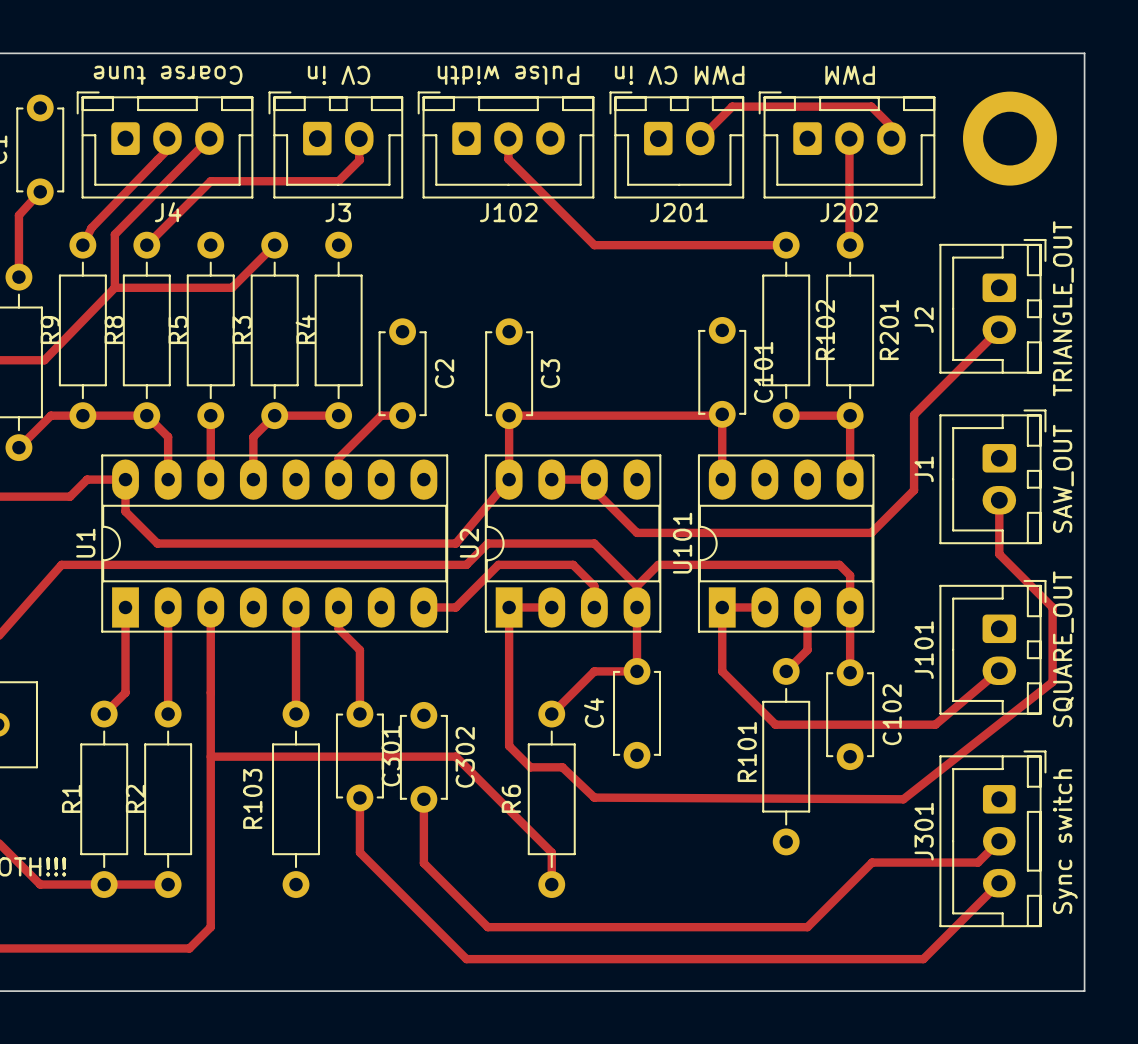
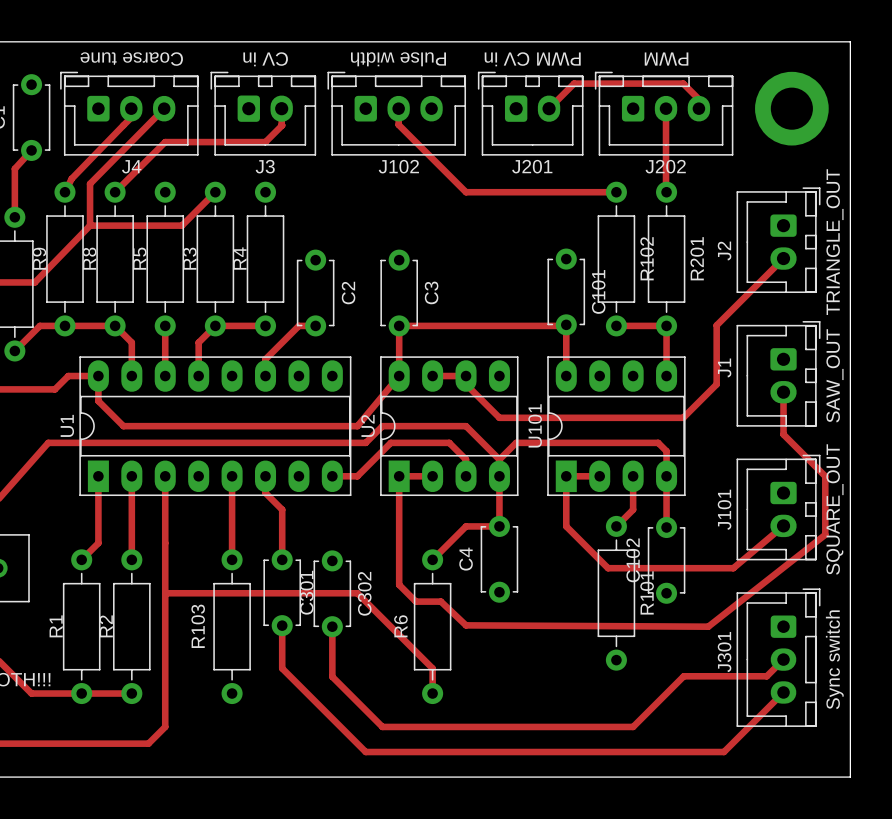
C102 name position: C102 (892, 714) -> C102 (633, 560)
R101 name position: R101 (747, 752) -> R101 (647, 592)

